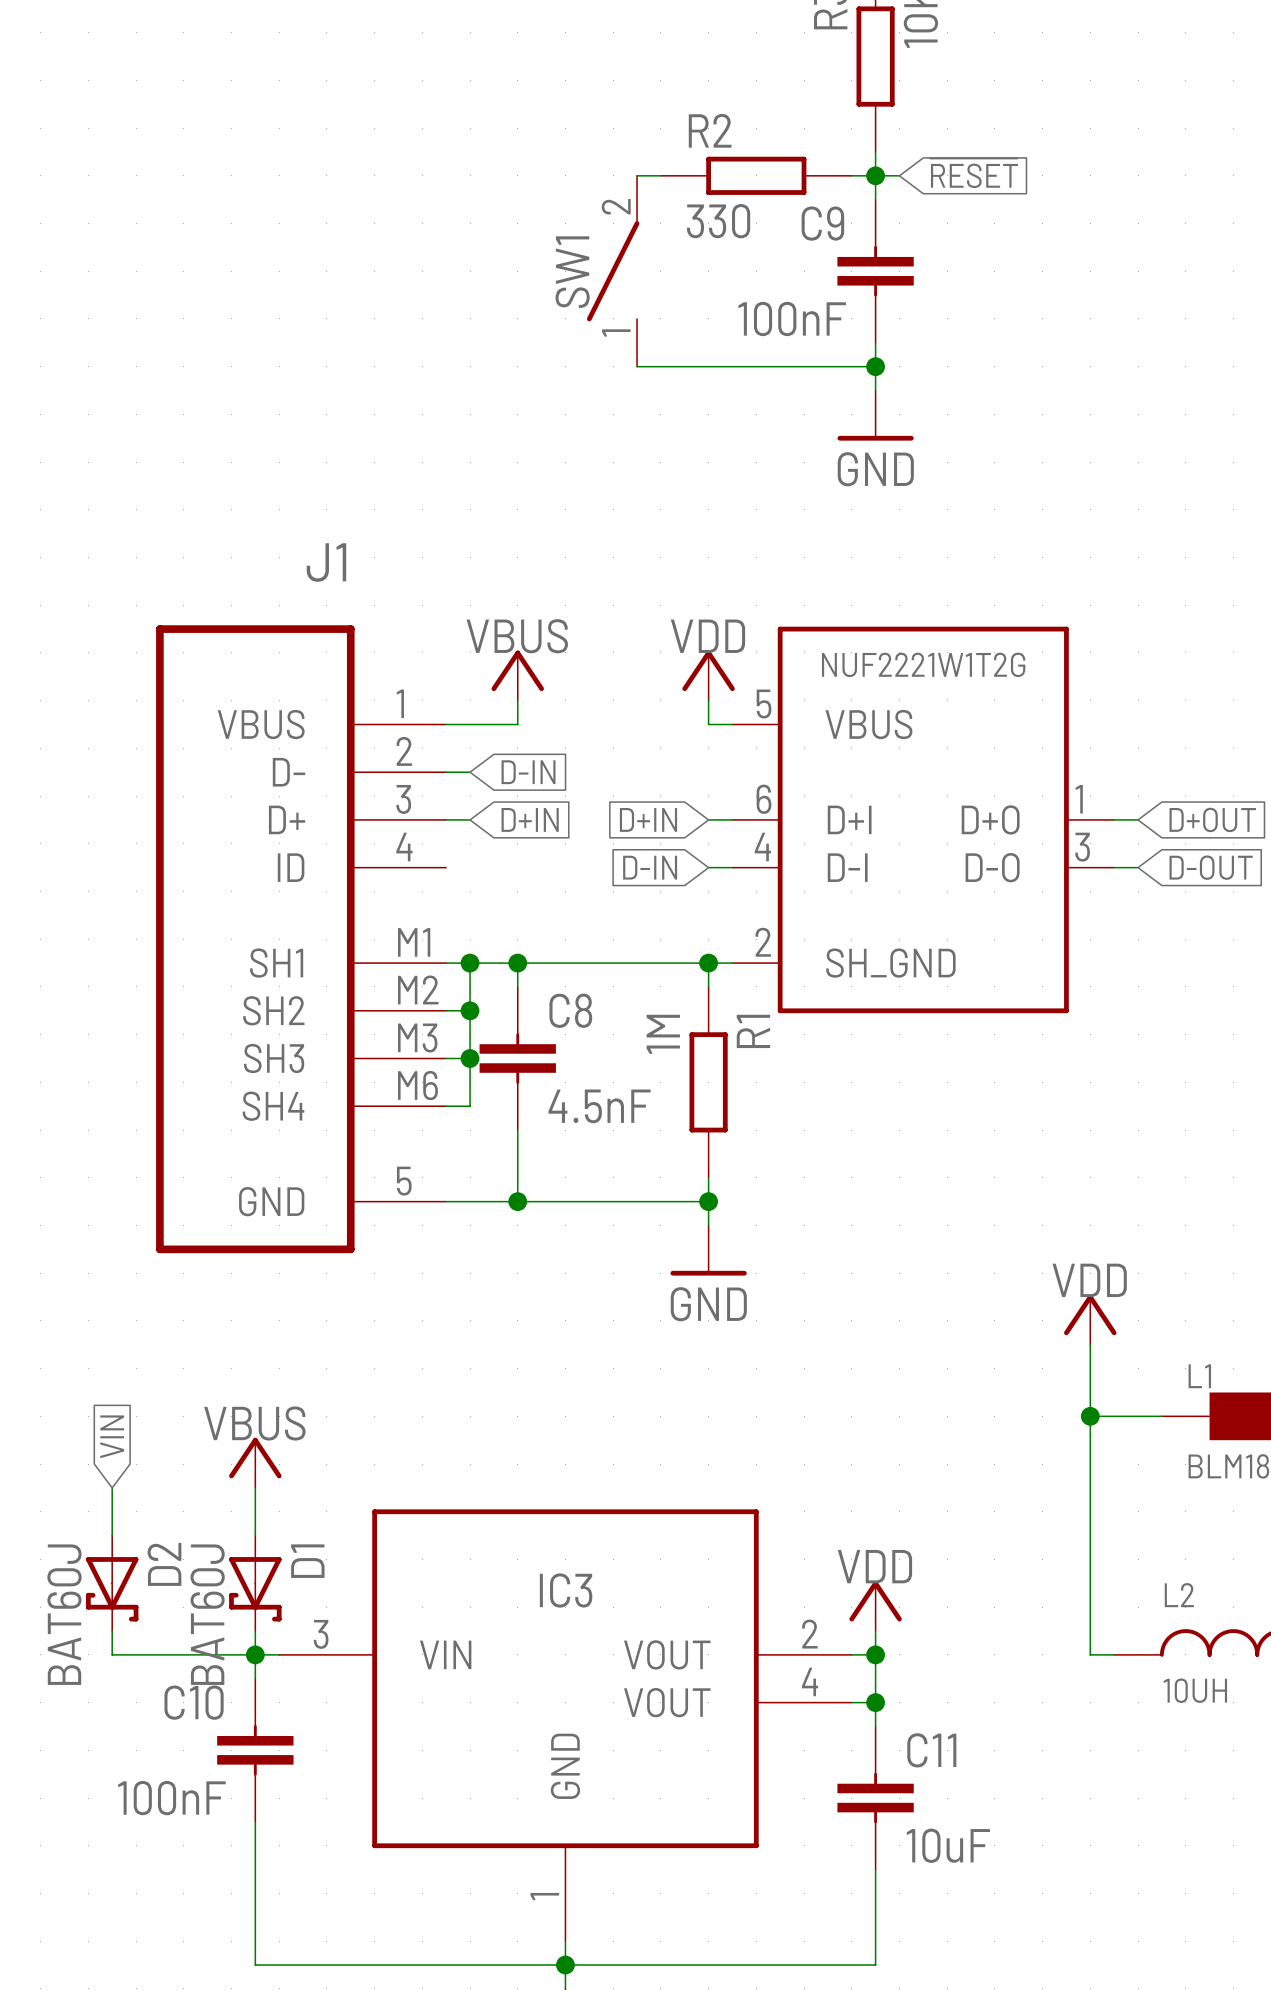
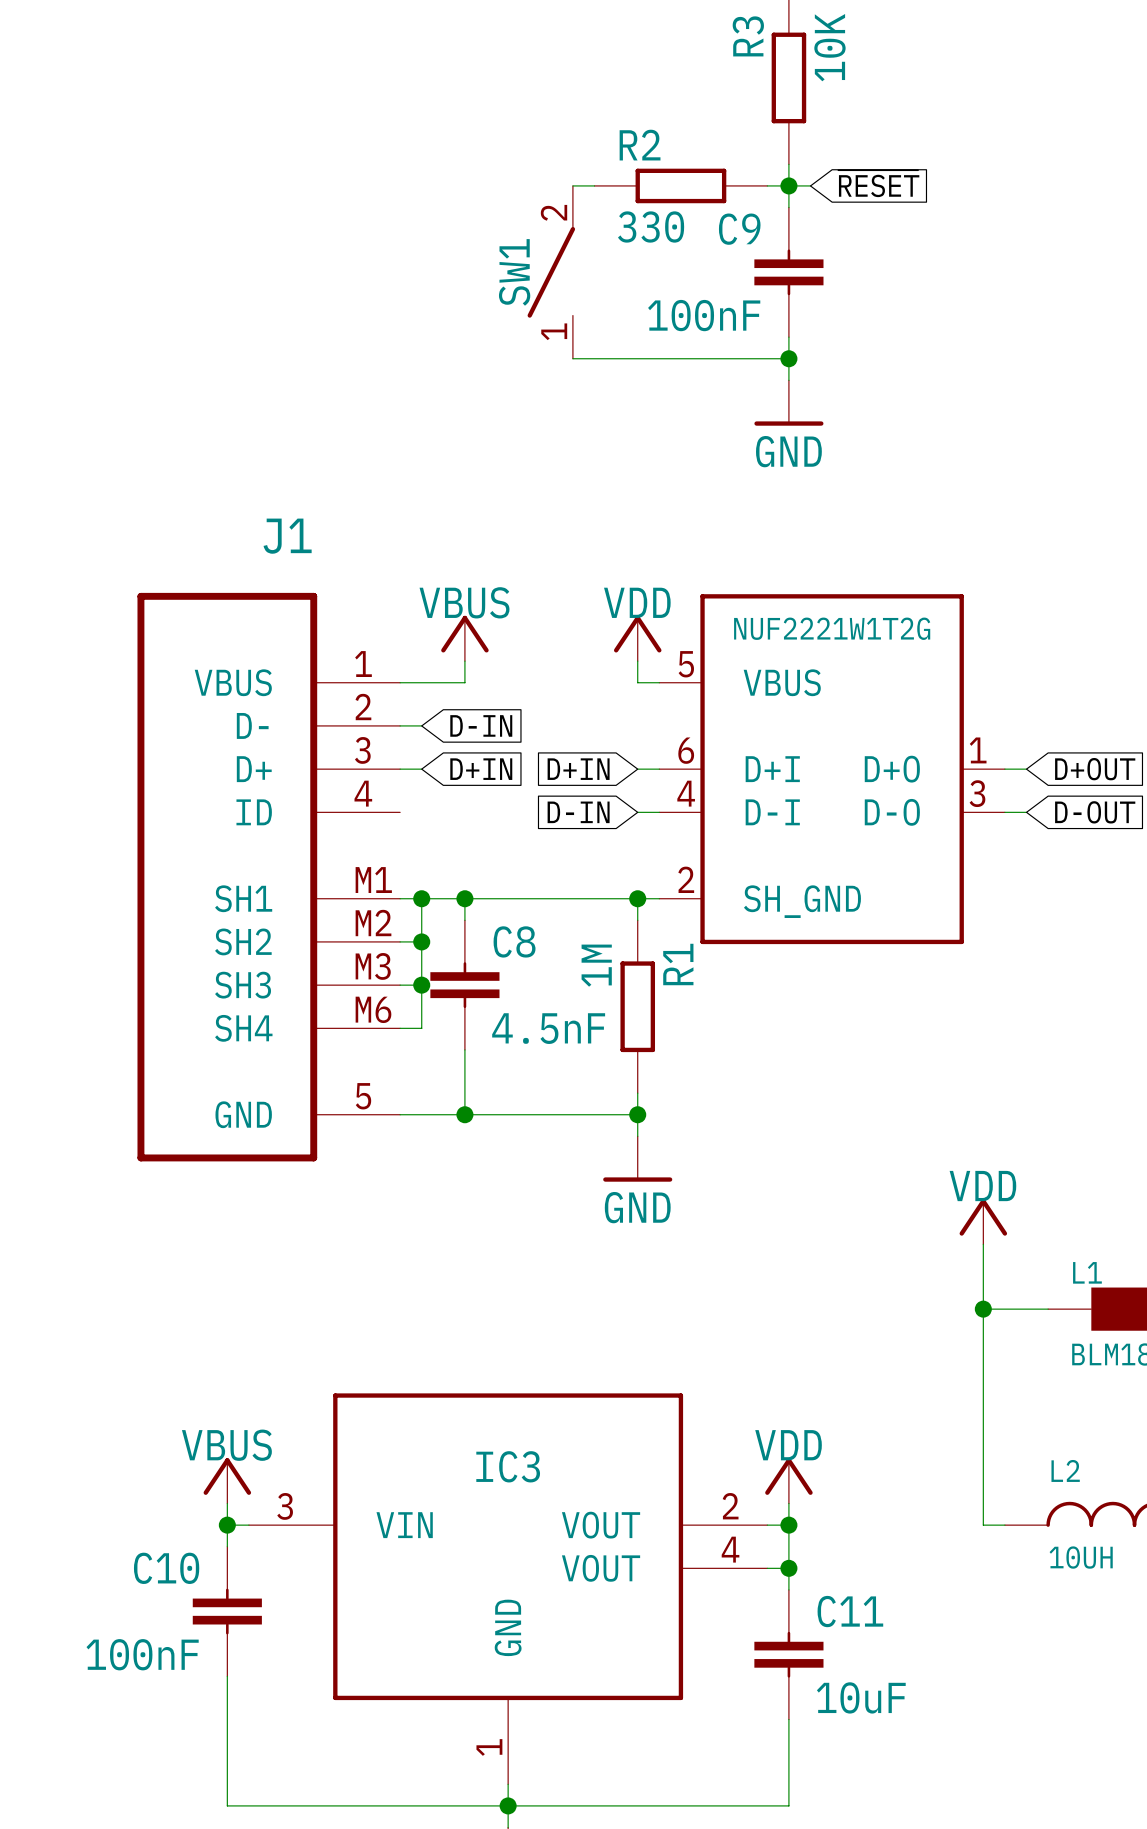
global label: VIN (112, 1436) -> none
power symbol position: VBUS (255, 1462) -> VBUS (227, 1480)
wire: (112, 1487) (112, 1535) -> none
wire: (255, 1487) (255, 1535) -> none
D2: BAT60J (112, 1583) -> none
D1: BAT60J (255, 1583) -> none
wire: (112, 1631) (112, 1654) (255, 1654) -> none

